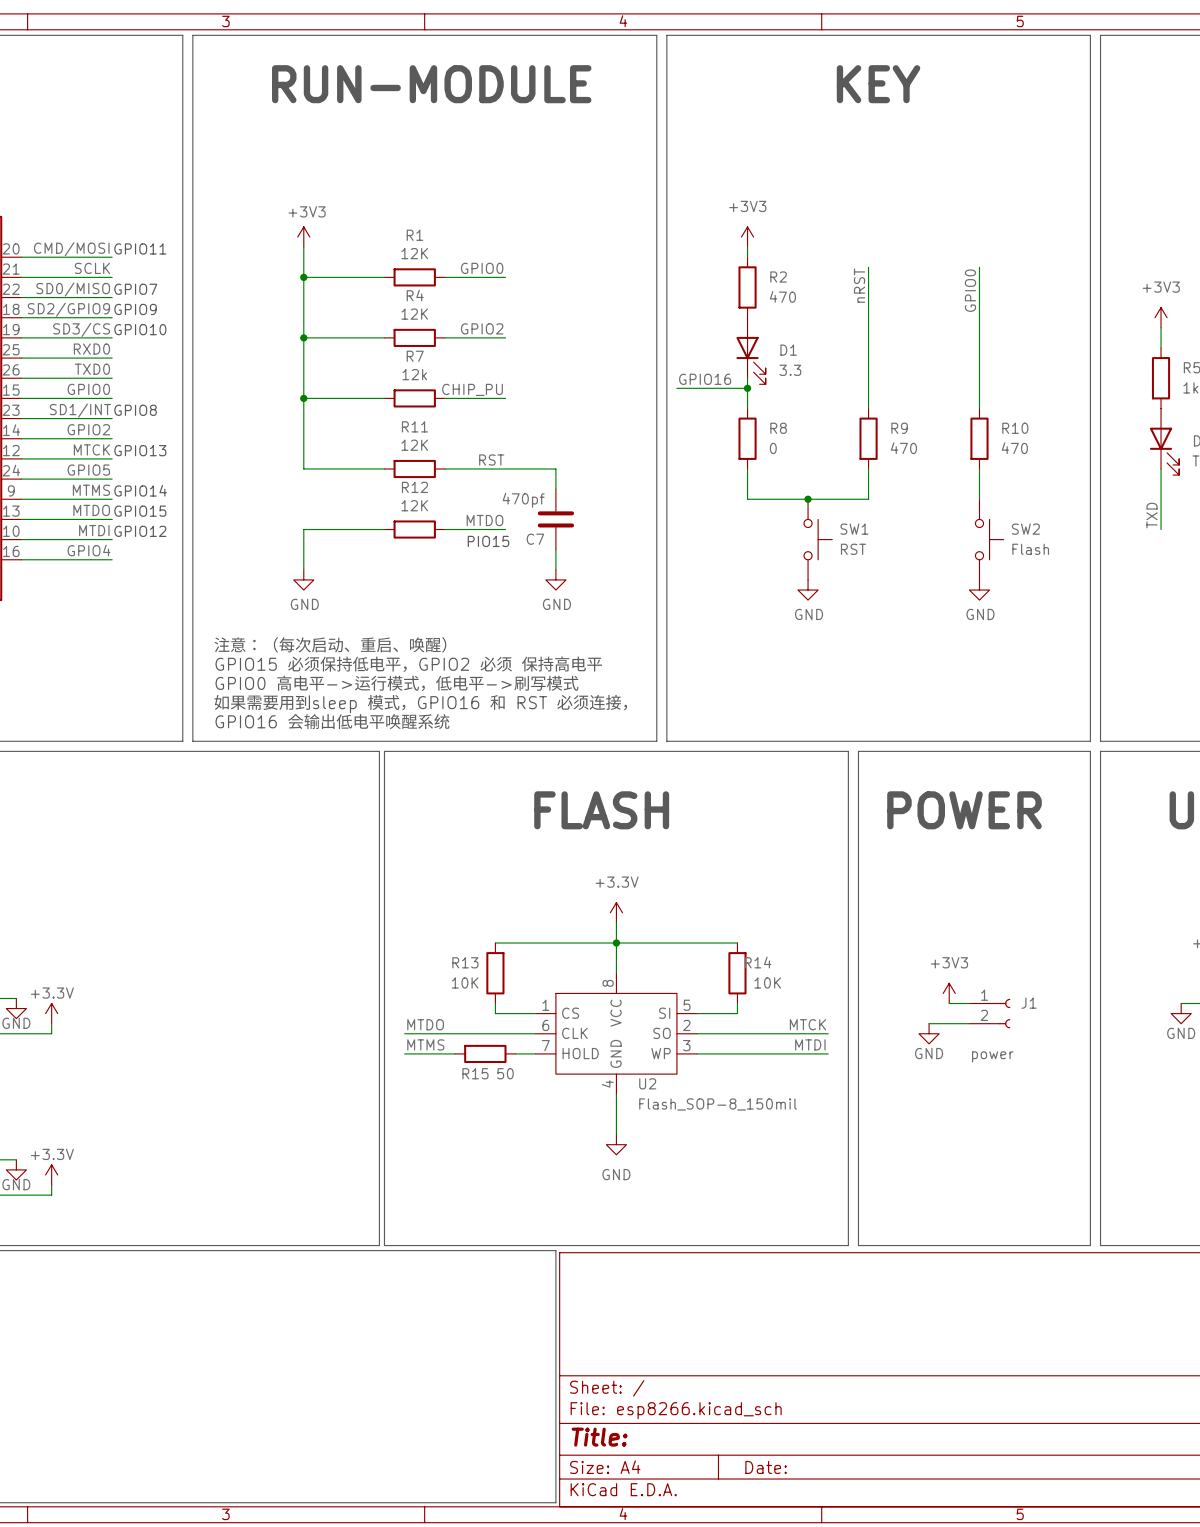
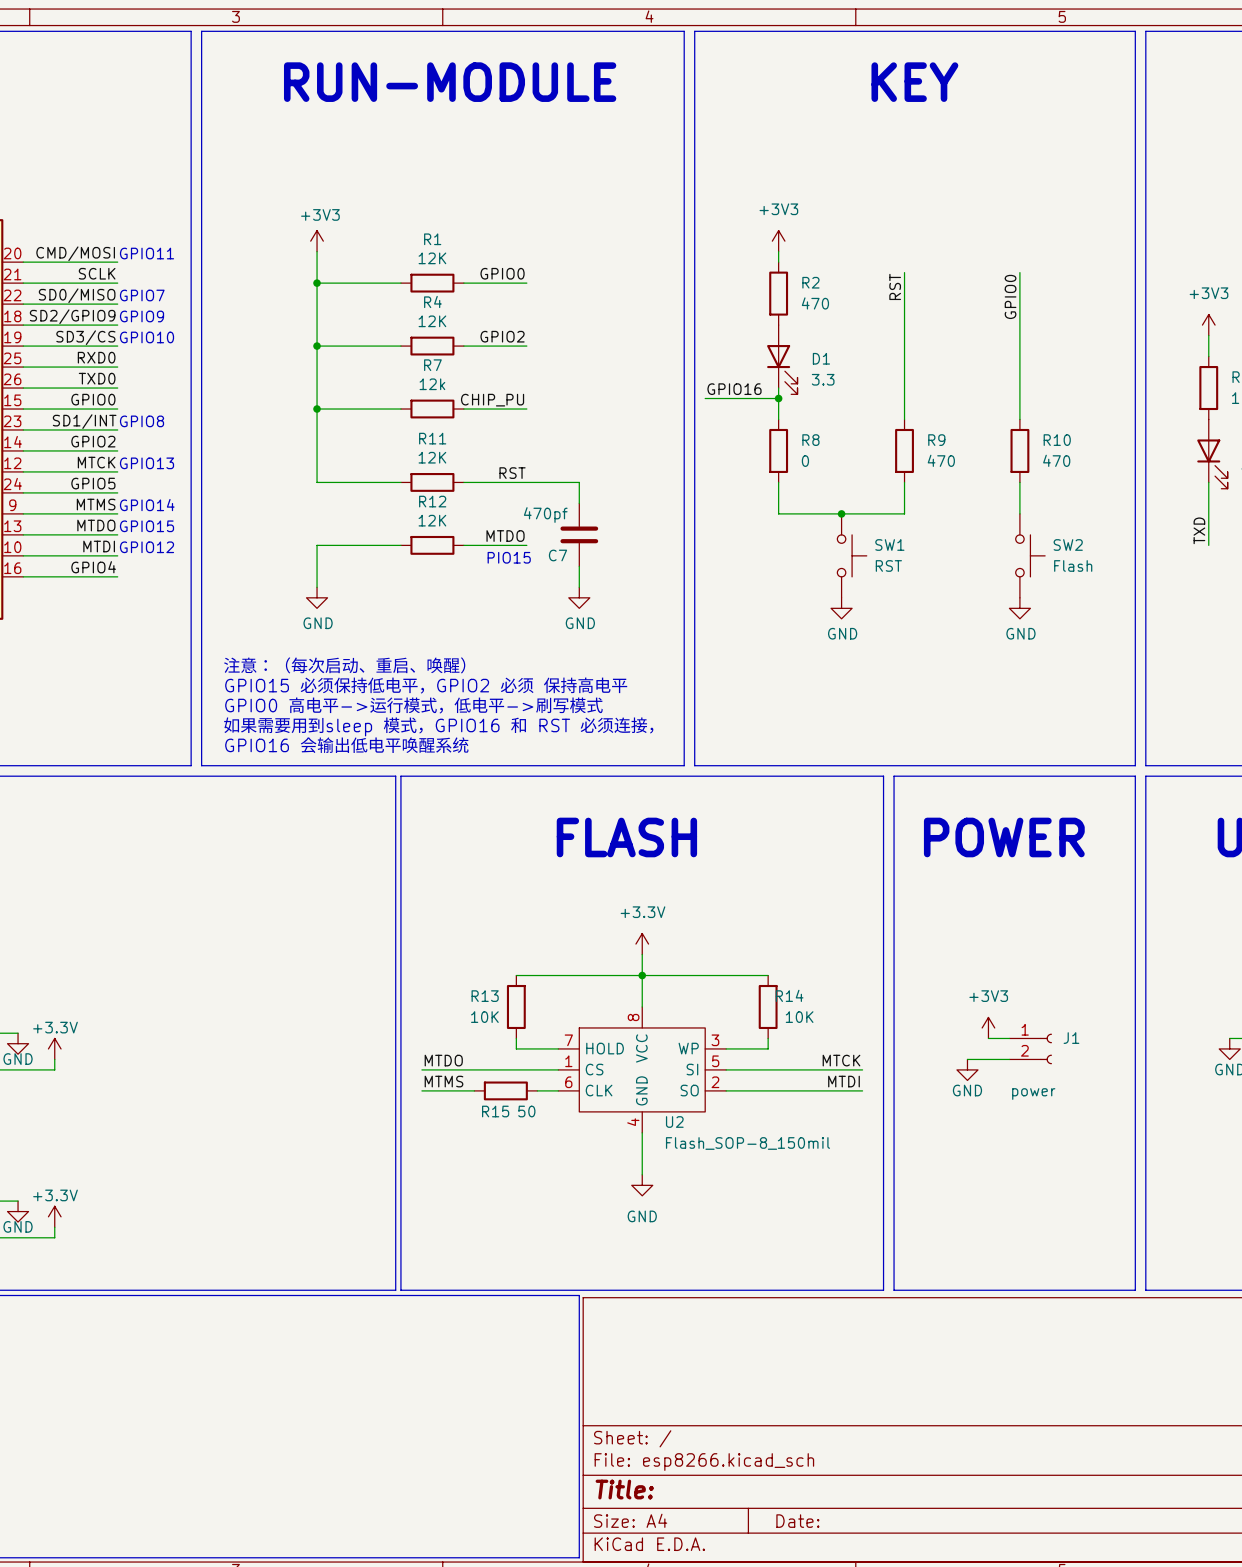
label: nRST (859, 285) -> RST (895, 286)
U2 symbol: [535, 973, 698, 1095] -> [558, 1006, 727, 1133]

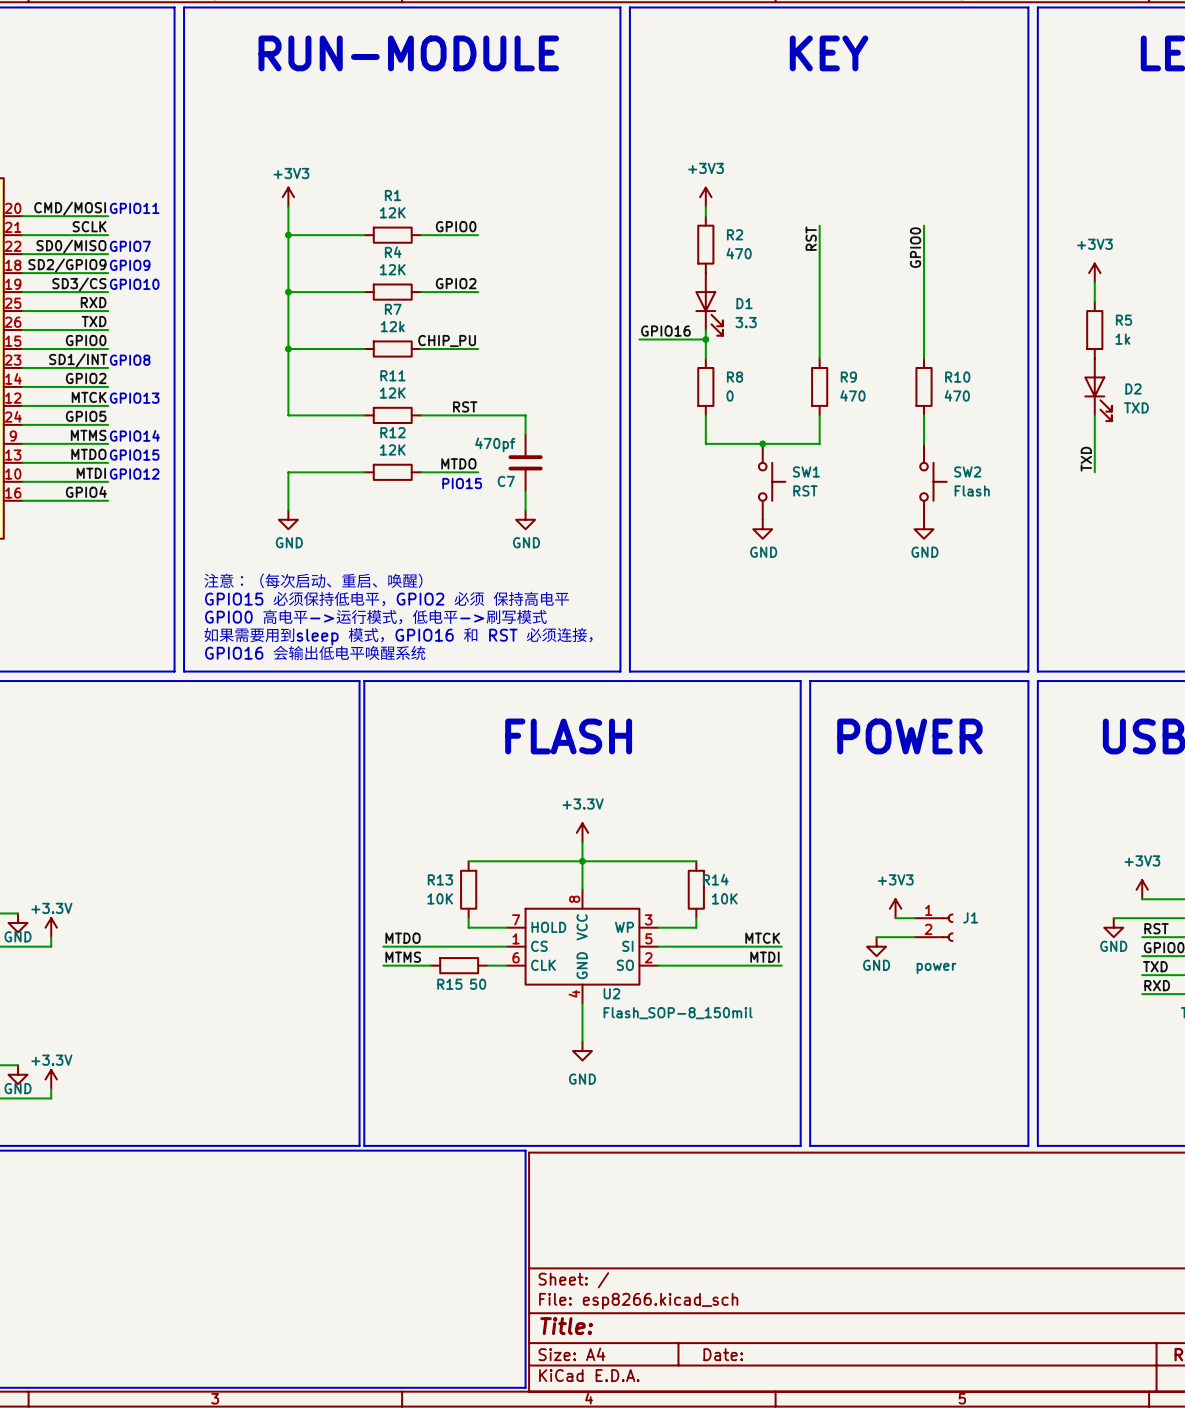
label: RXD0 (96, 357) -> RXD (93, 302)
label: TXD0 (97, 378) -> TXD (94, 321)

